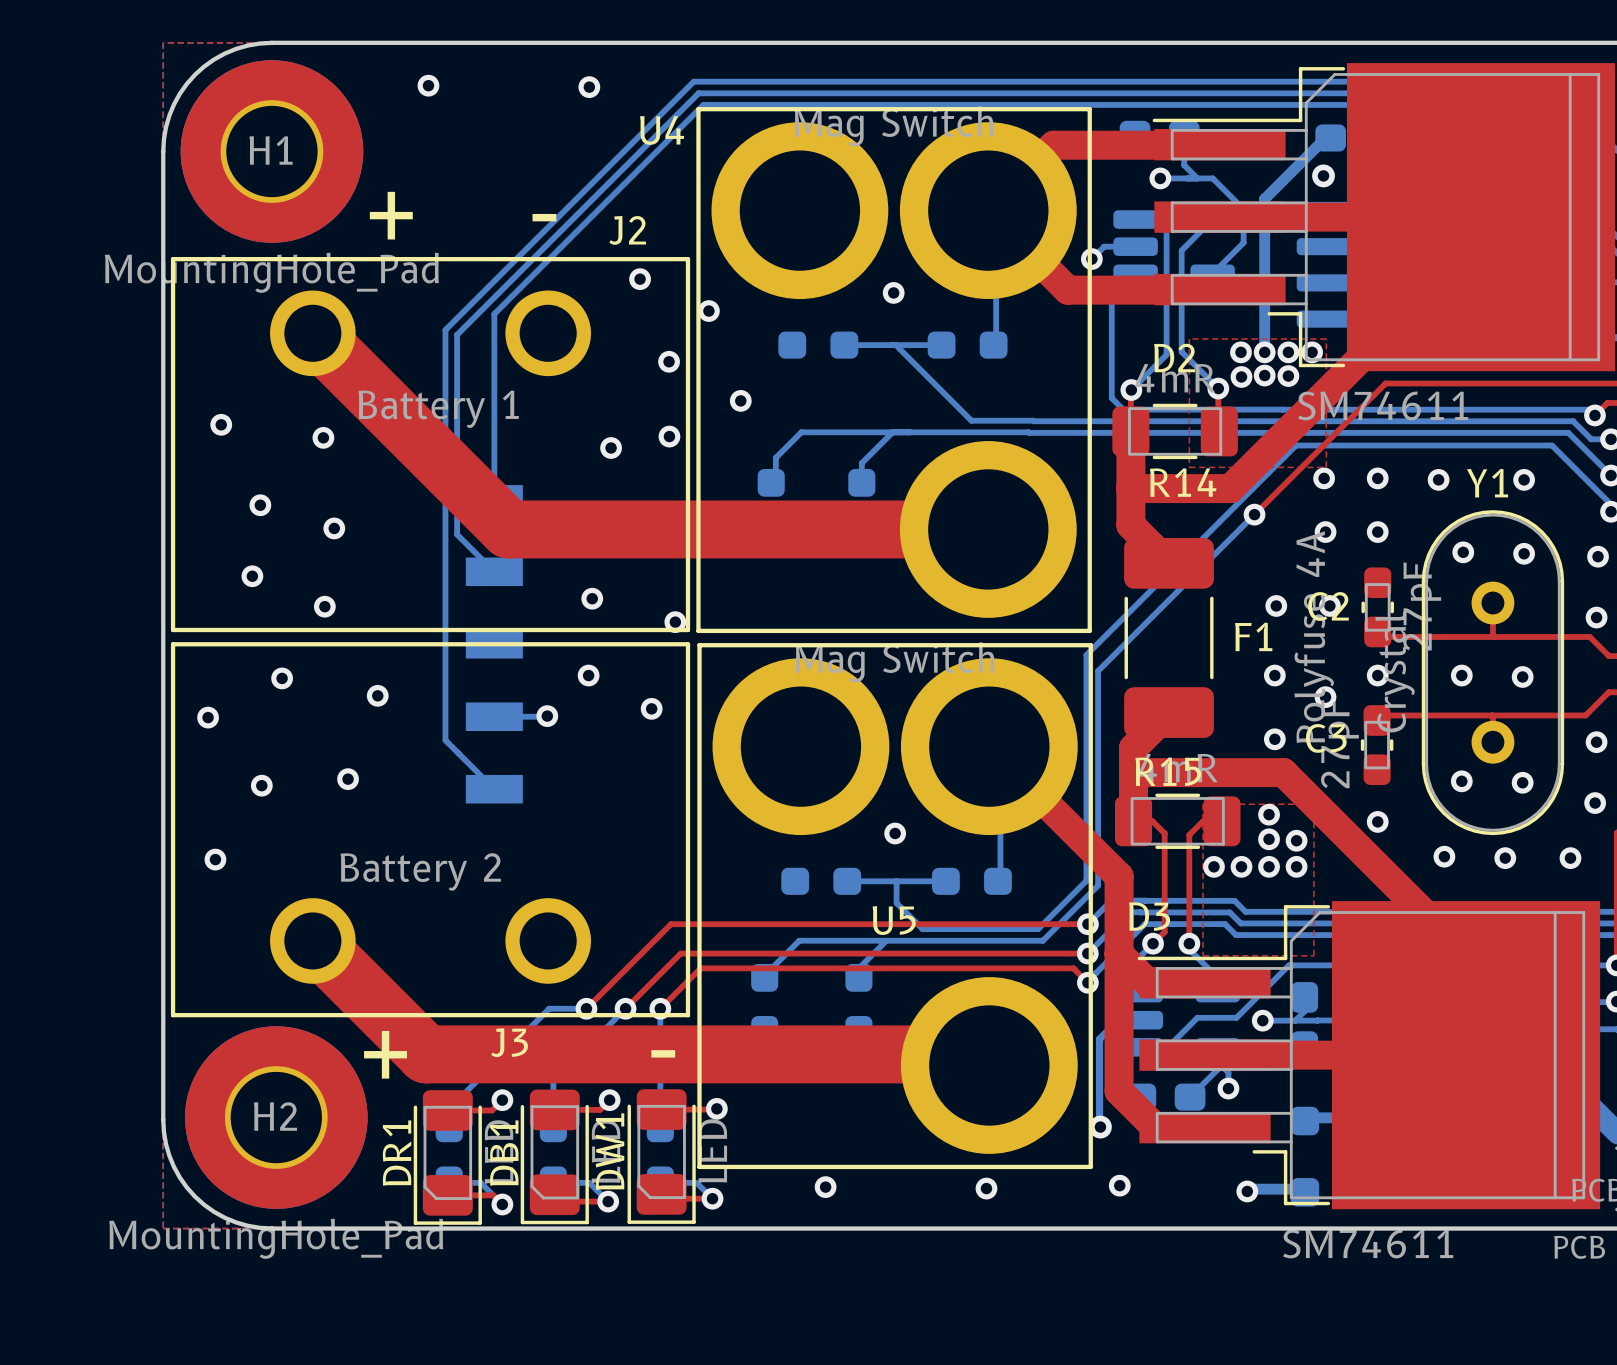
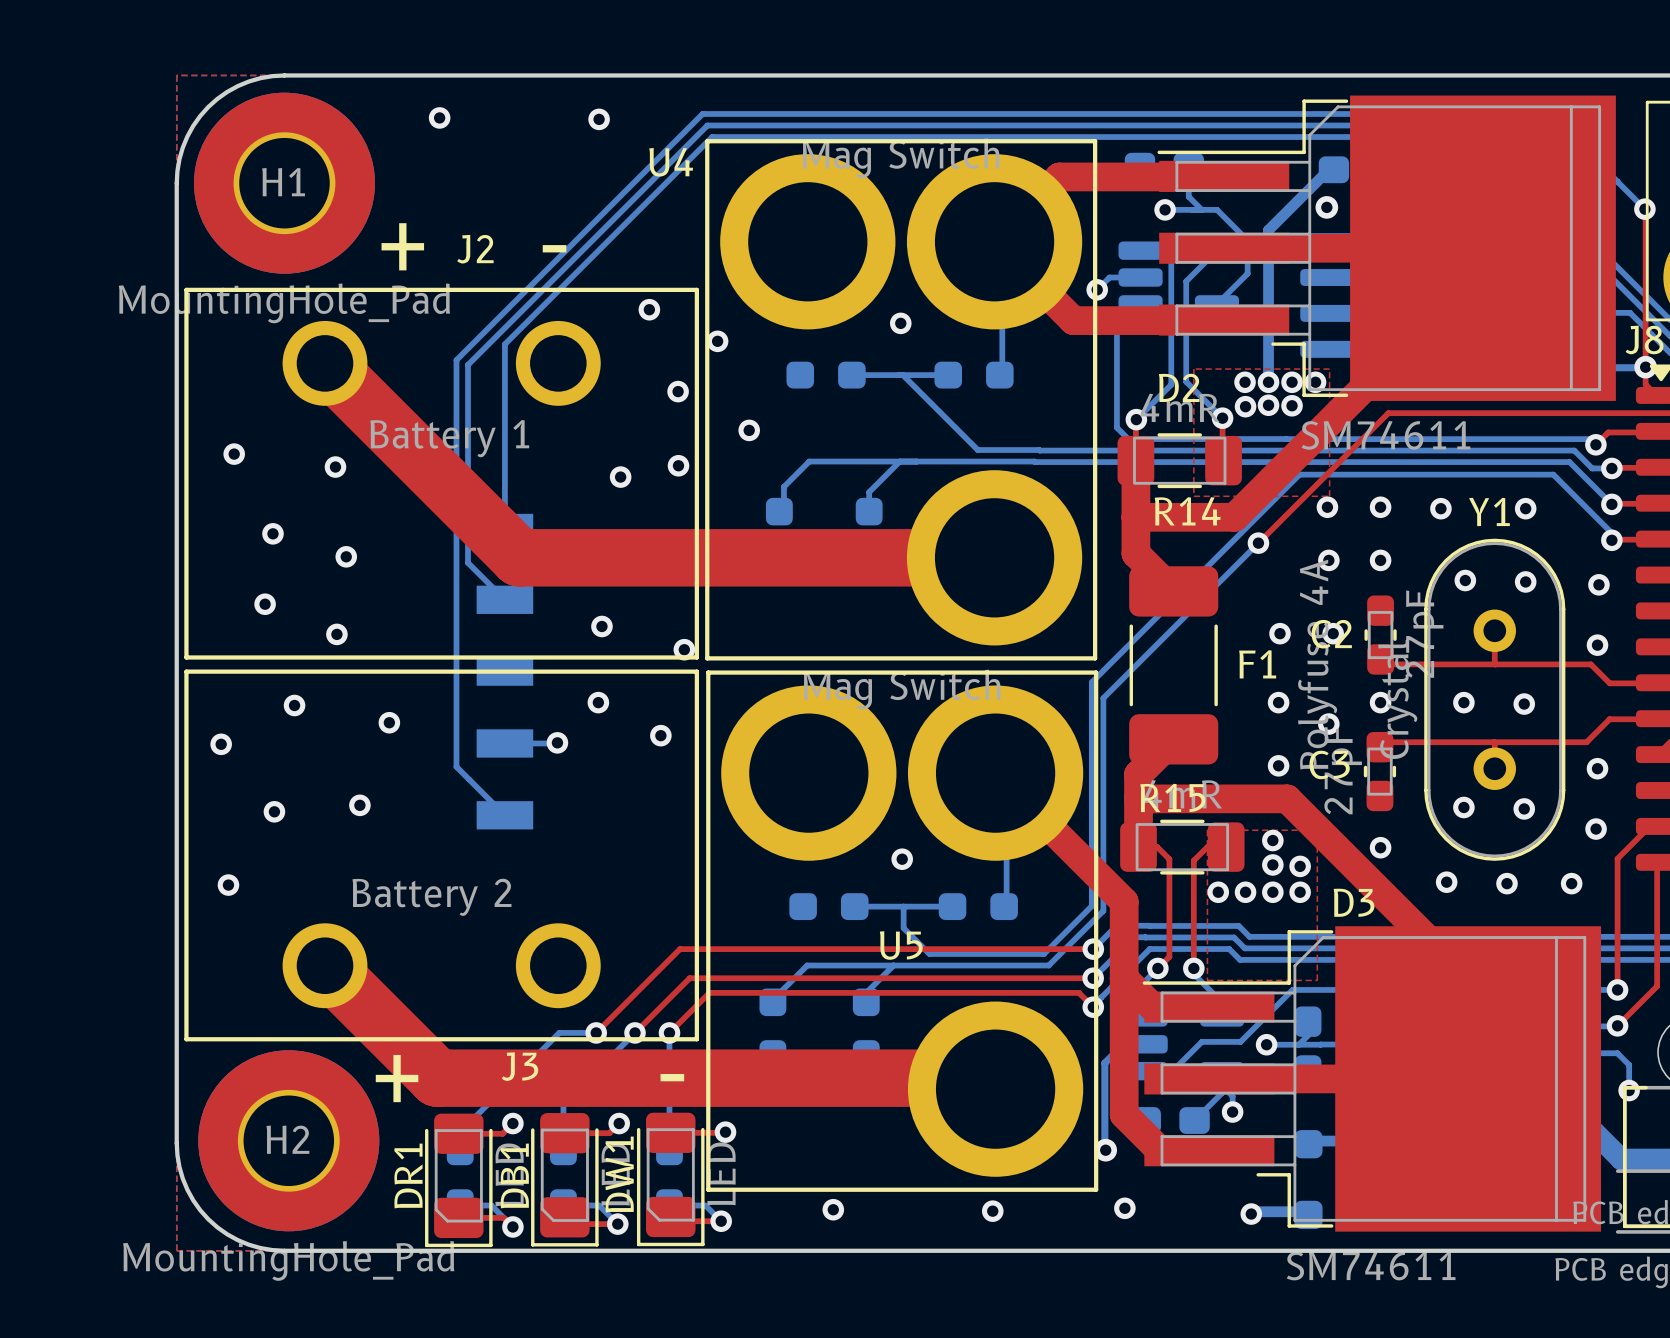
J2 name position: J2 (627, 230) -> J2 (475, 249)
D3 name position: D3 (1149, 916) -> D3 (1354, 902)

